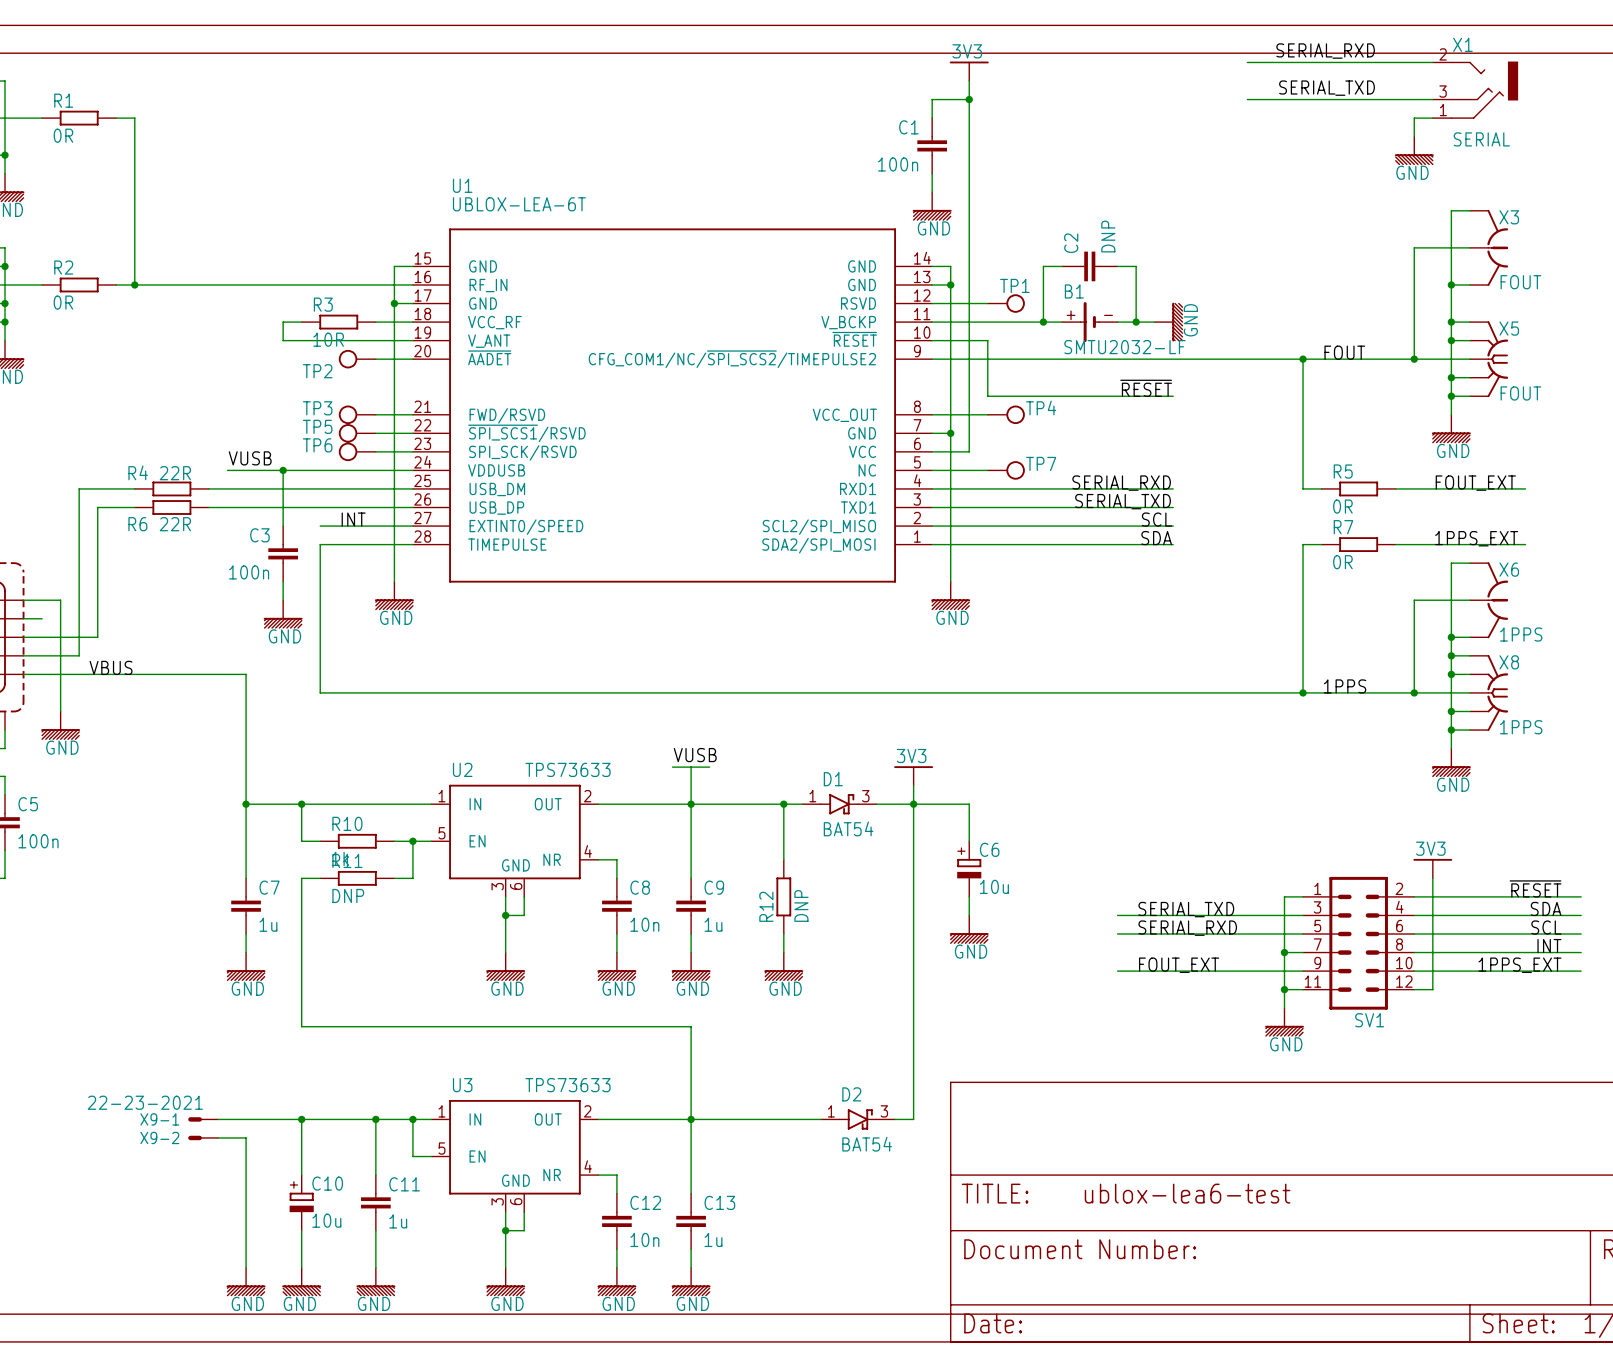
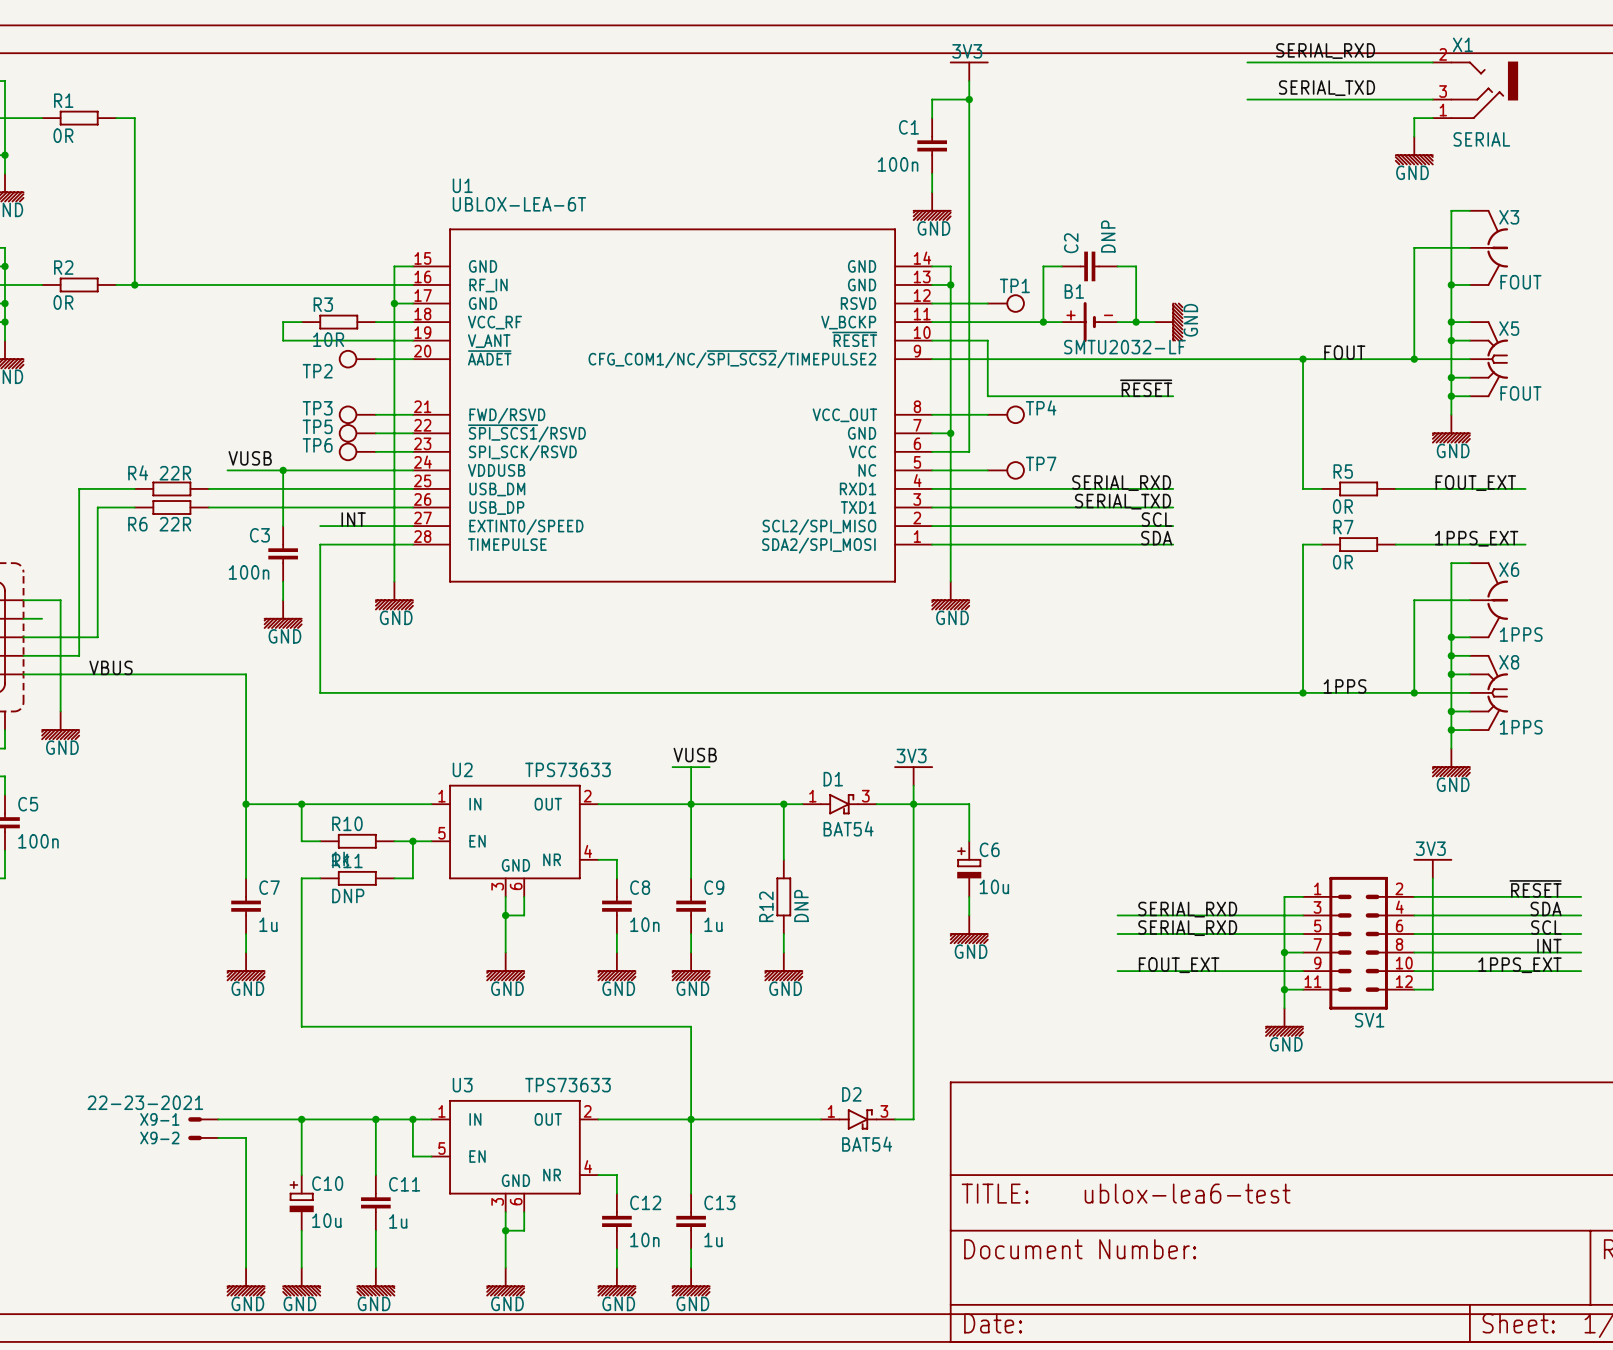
label: SERIAL_TXD (1186, 909) -> SERIAL_RXD (1187, 909)

